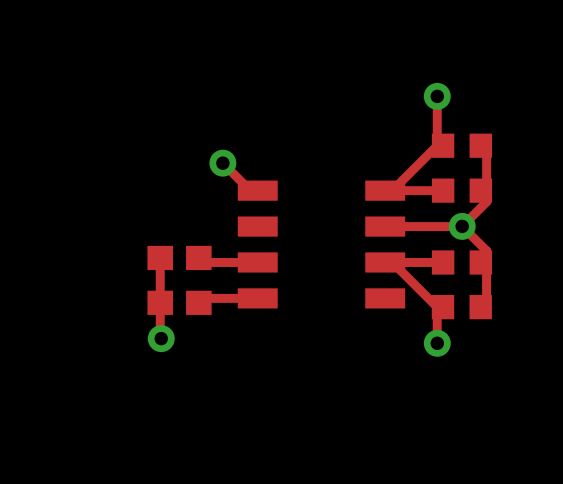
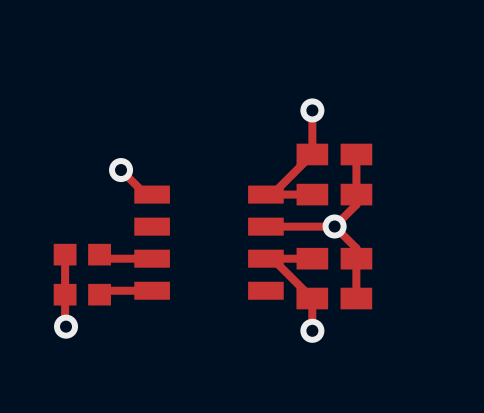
part footprint: [431, 133, 493, 158] -> [296, 143, 373, 166]
part footprint: [431, 178, 493, 203] -> [296, 183, 373, 206]
part footprint: [431, 250, 493, 275] -> [296, 247, 373, 270]
part footprint: [431, 294, 492, 320] -> [296, 287, 373, 310]

